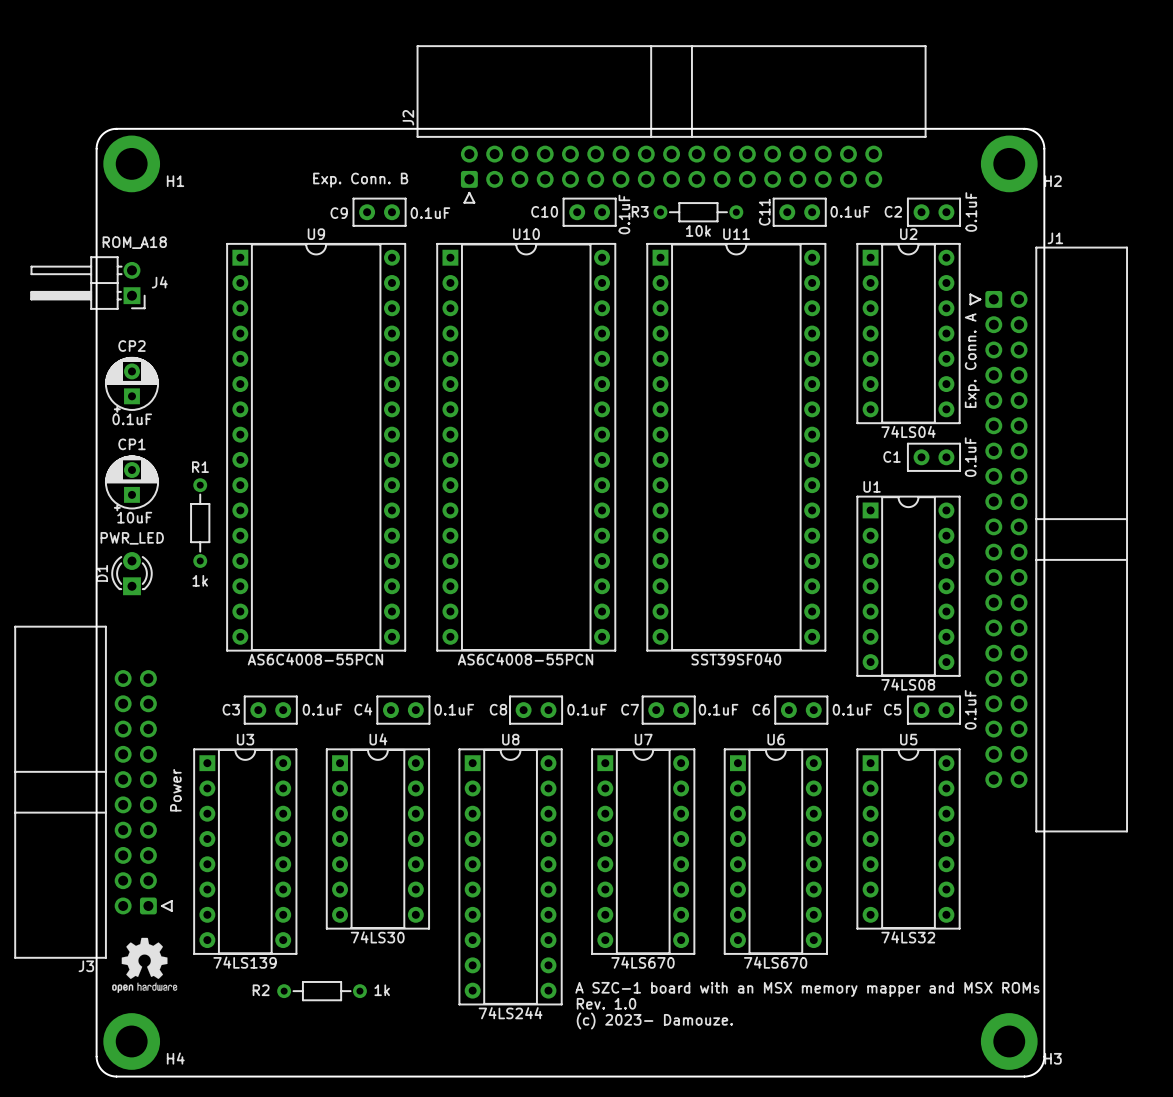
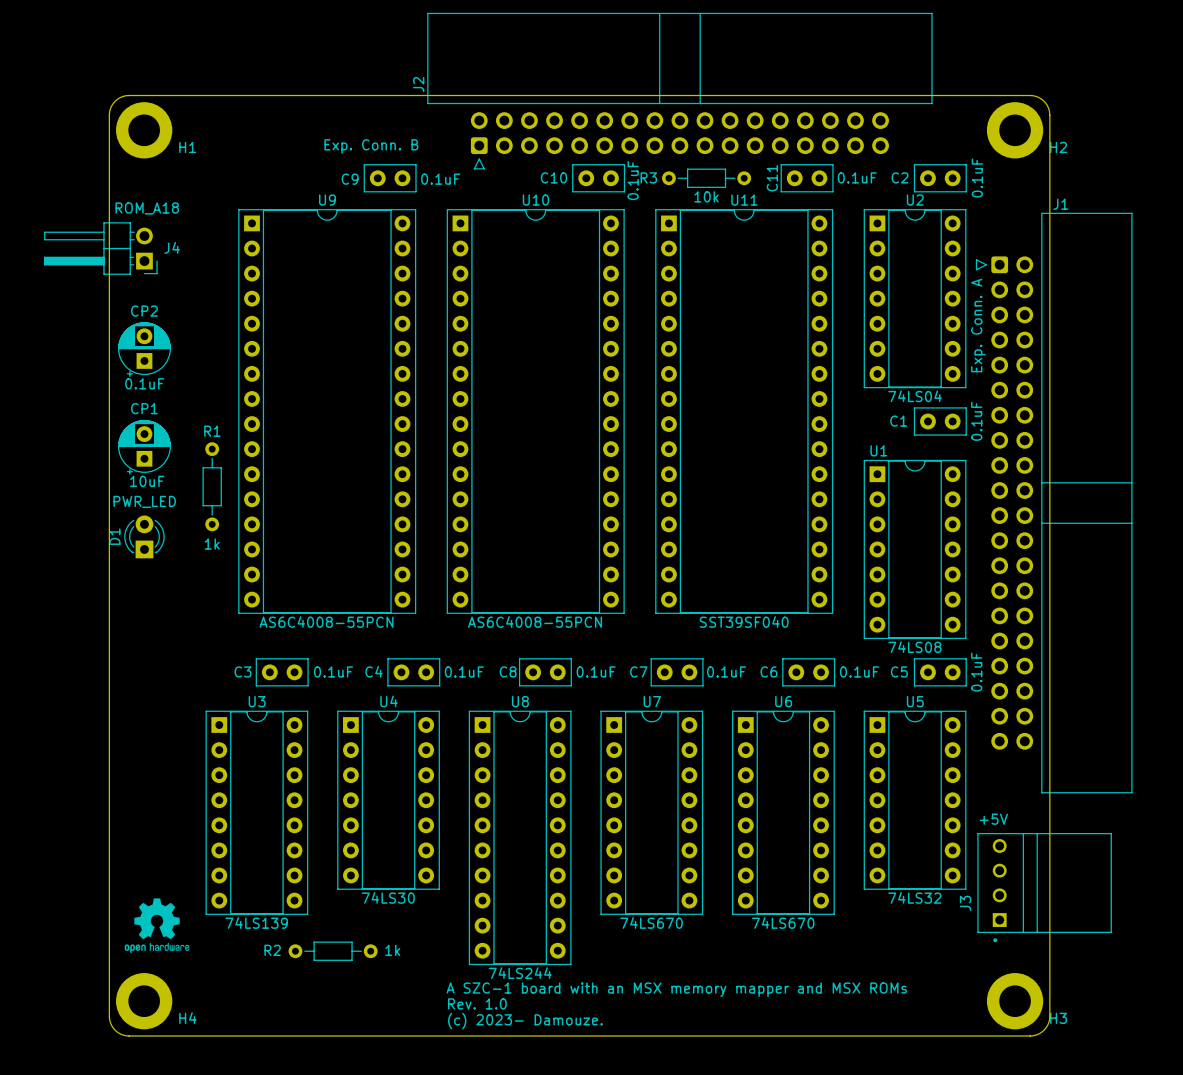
J3 footprint: [14, 626, 173, 959] -> [977, 833, 1112, 943]
J3 value: Power (175, 790) -> none
text: none -> +5V (993, 819)
J3 name position: J3 (86, 966) -> J3 (965, 903)
text position: A SZC-1 board with an MSX memory mapper and MSX ROMs (807, 989) -> A SZC-1 board with an MSX memory mapper and MSX ROMs (676, 989)
text position: Rev. 1.0 (606, 1003) -> Rev. 1.0 (477, 1003)
text position: (c) 2023- Damouze. (654, 1021) -> (c) 2023- Damouze. (525, 1020)

